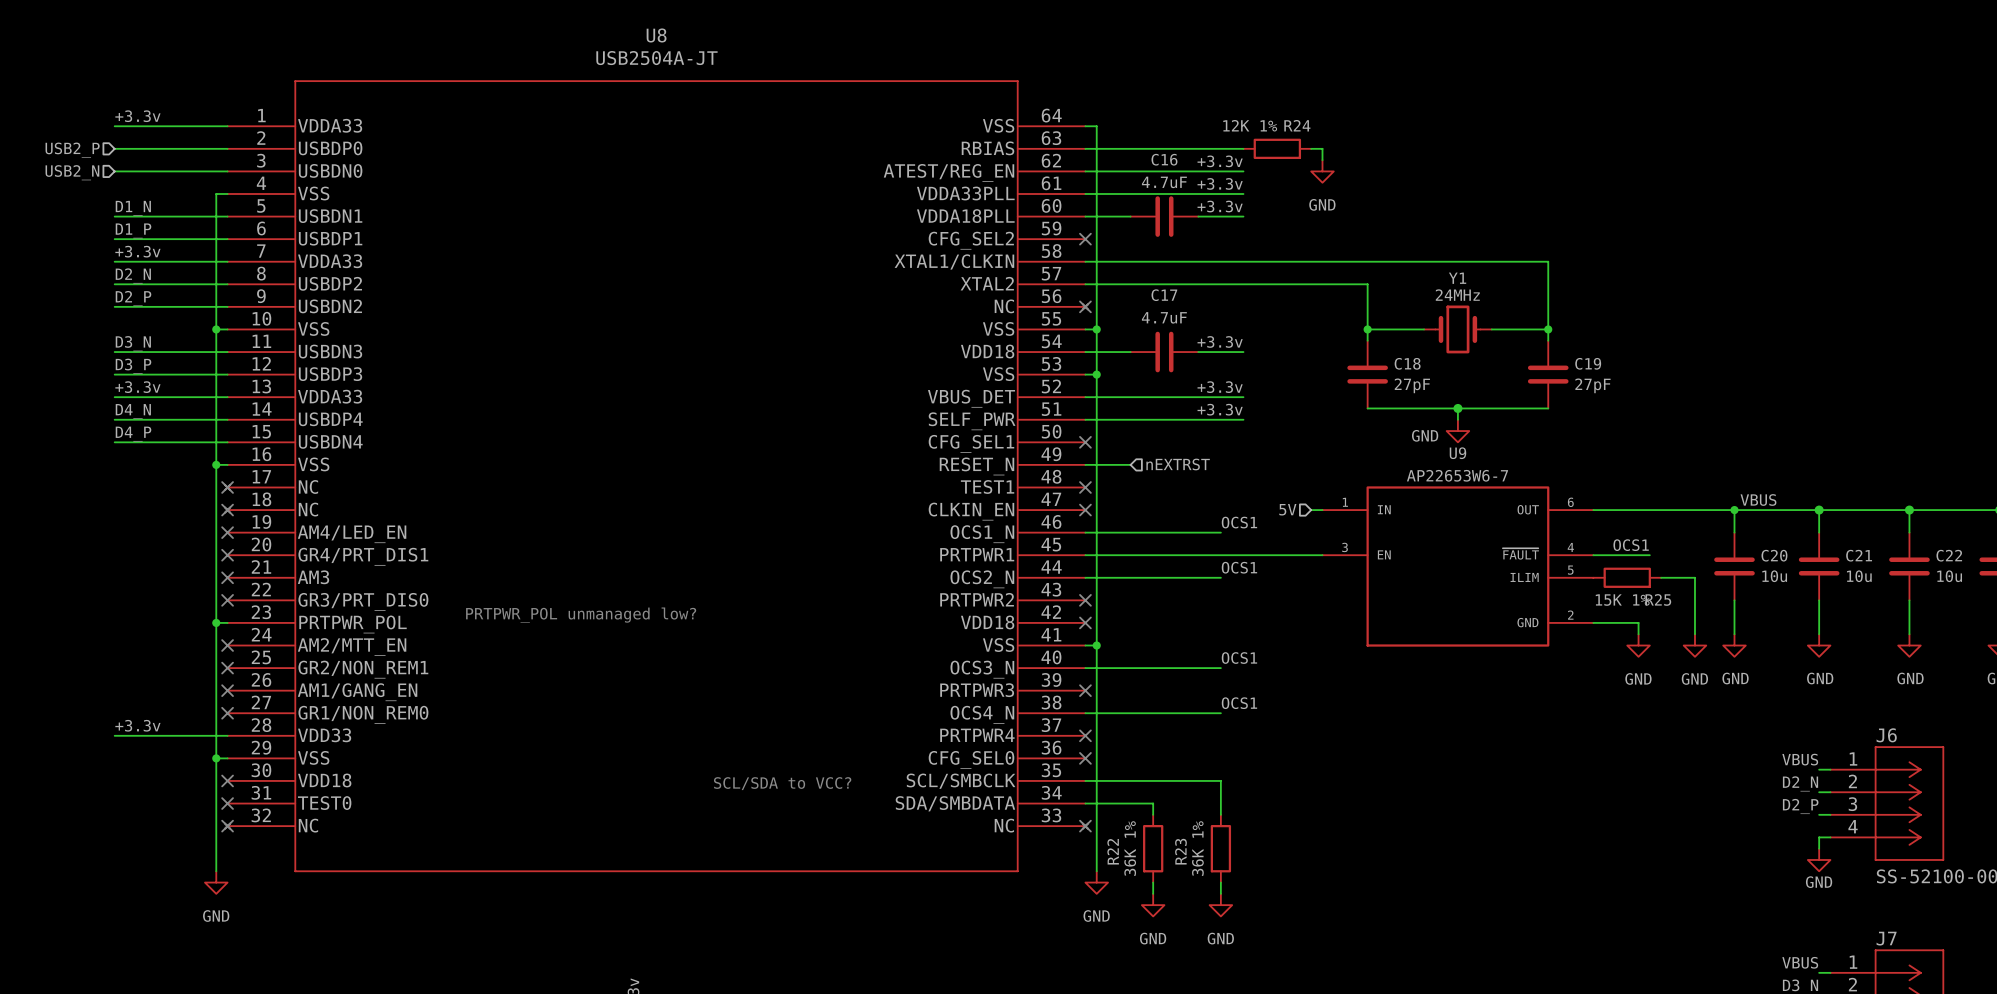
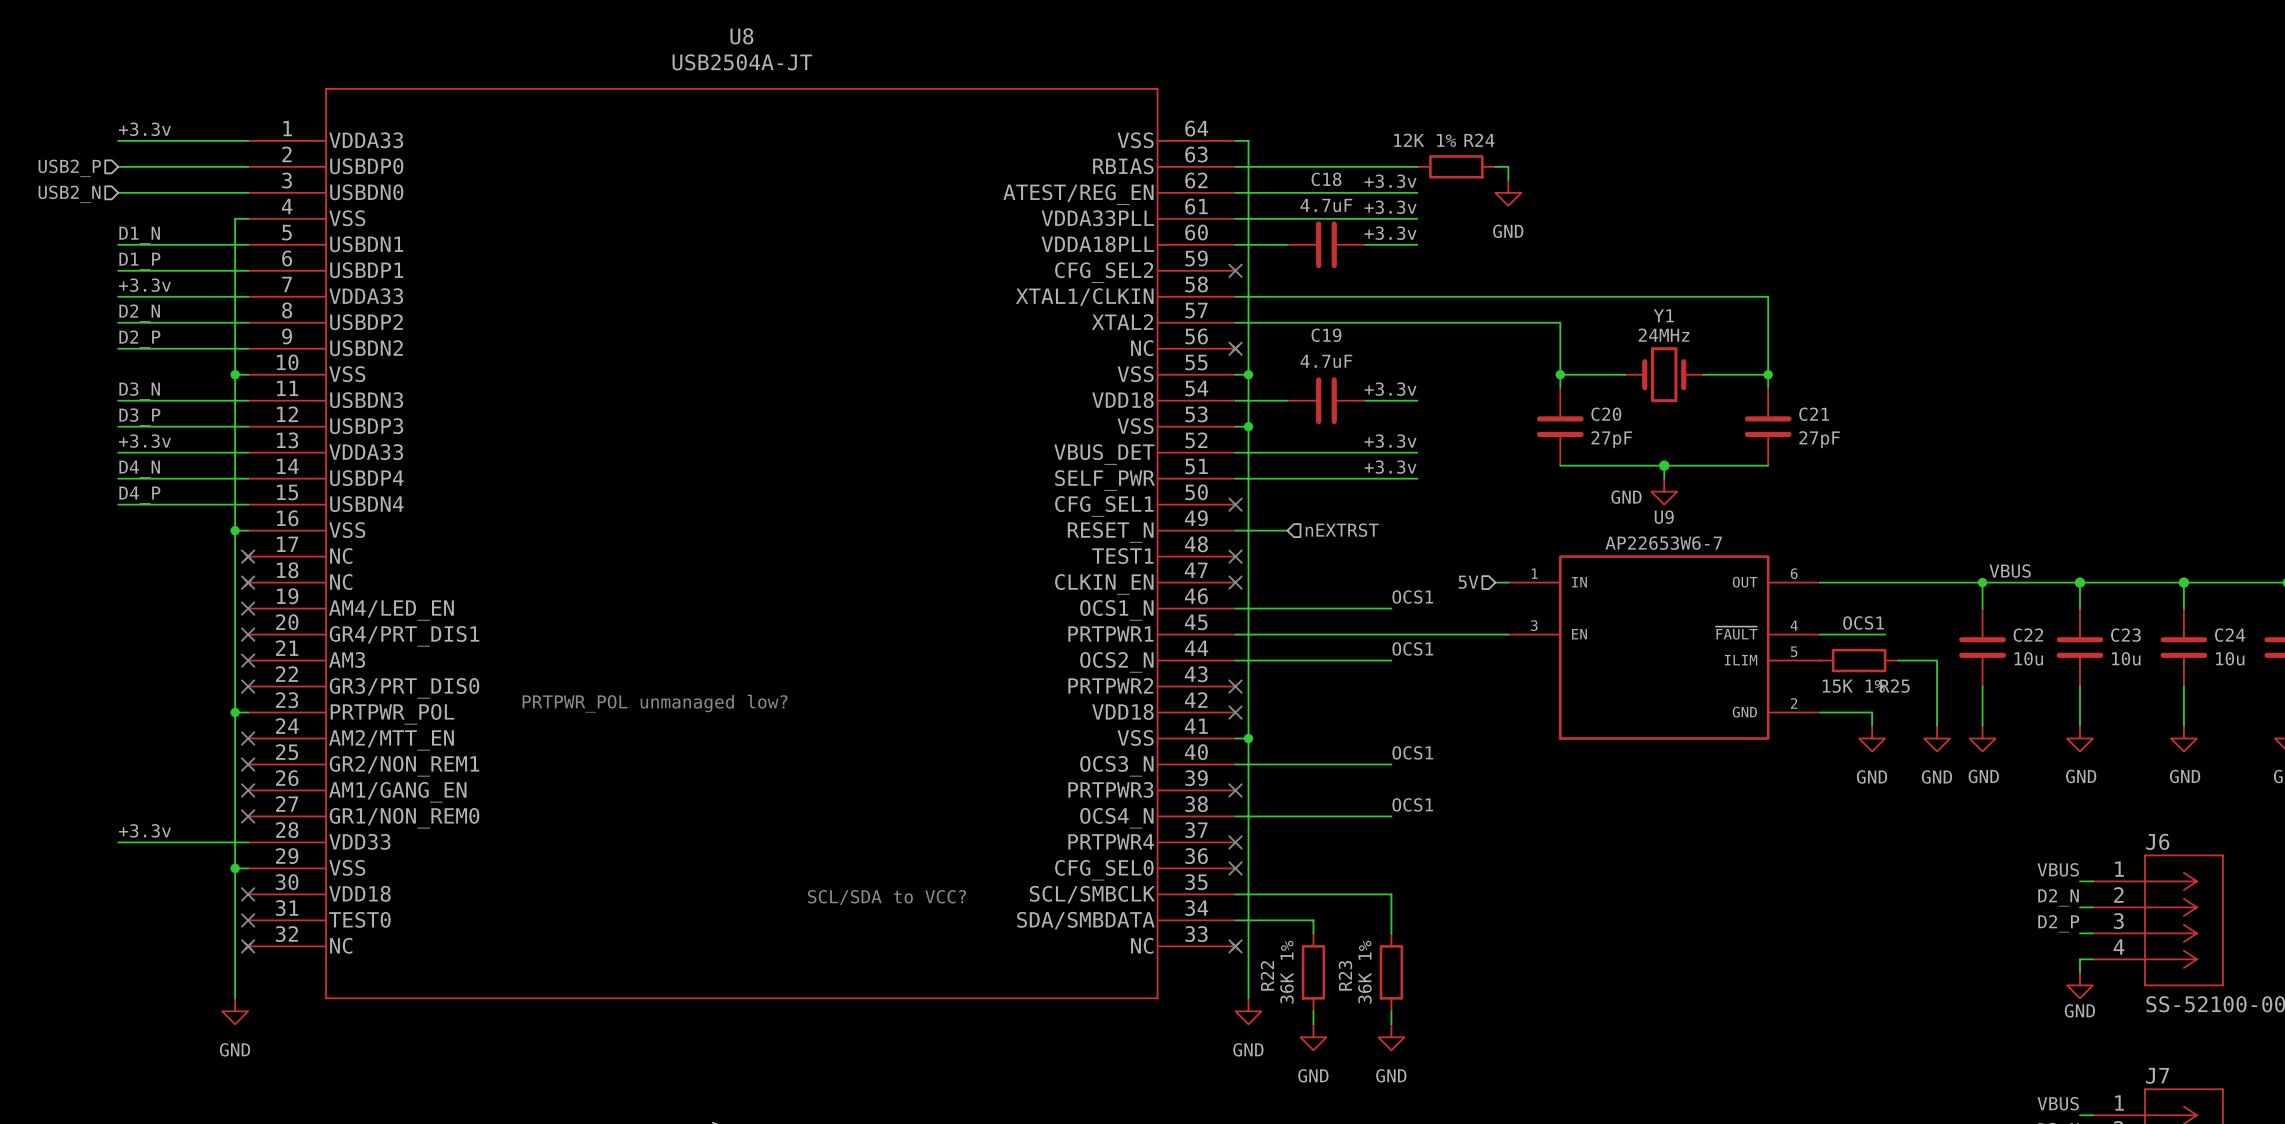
C16 name: C16 (1164, 159) -> C18 (1326, 179)
C17 name: C17 (1164, 295) -> C19 (1326, 335)
C18 name: C18 (1407, 363) -> C20 (1606, 414)
C19 name: C19 (1588, 363) -> C21 (1814, 414)
C20 name: C20 (1774, 555) -> C22 (2028, 635)
C21 name: C21 (1859, 555) -> C23 (2125, 635)
C22 name: C22 (1949, 555) -> C24 (2230, 635)

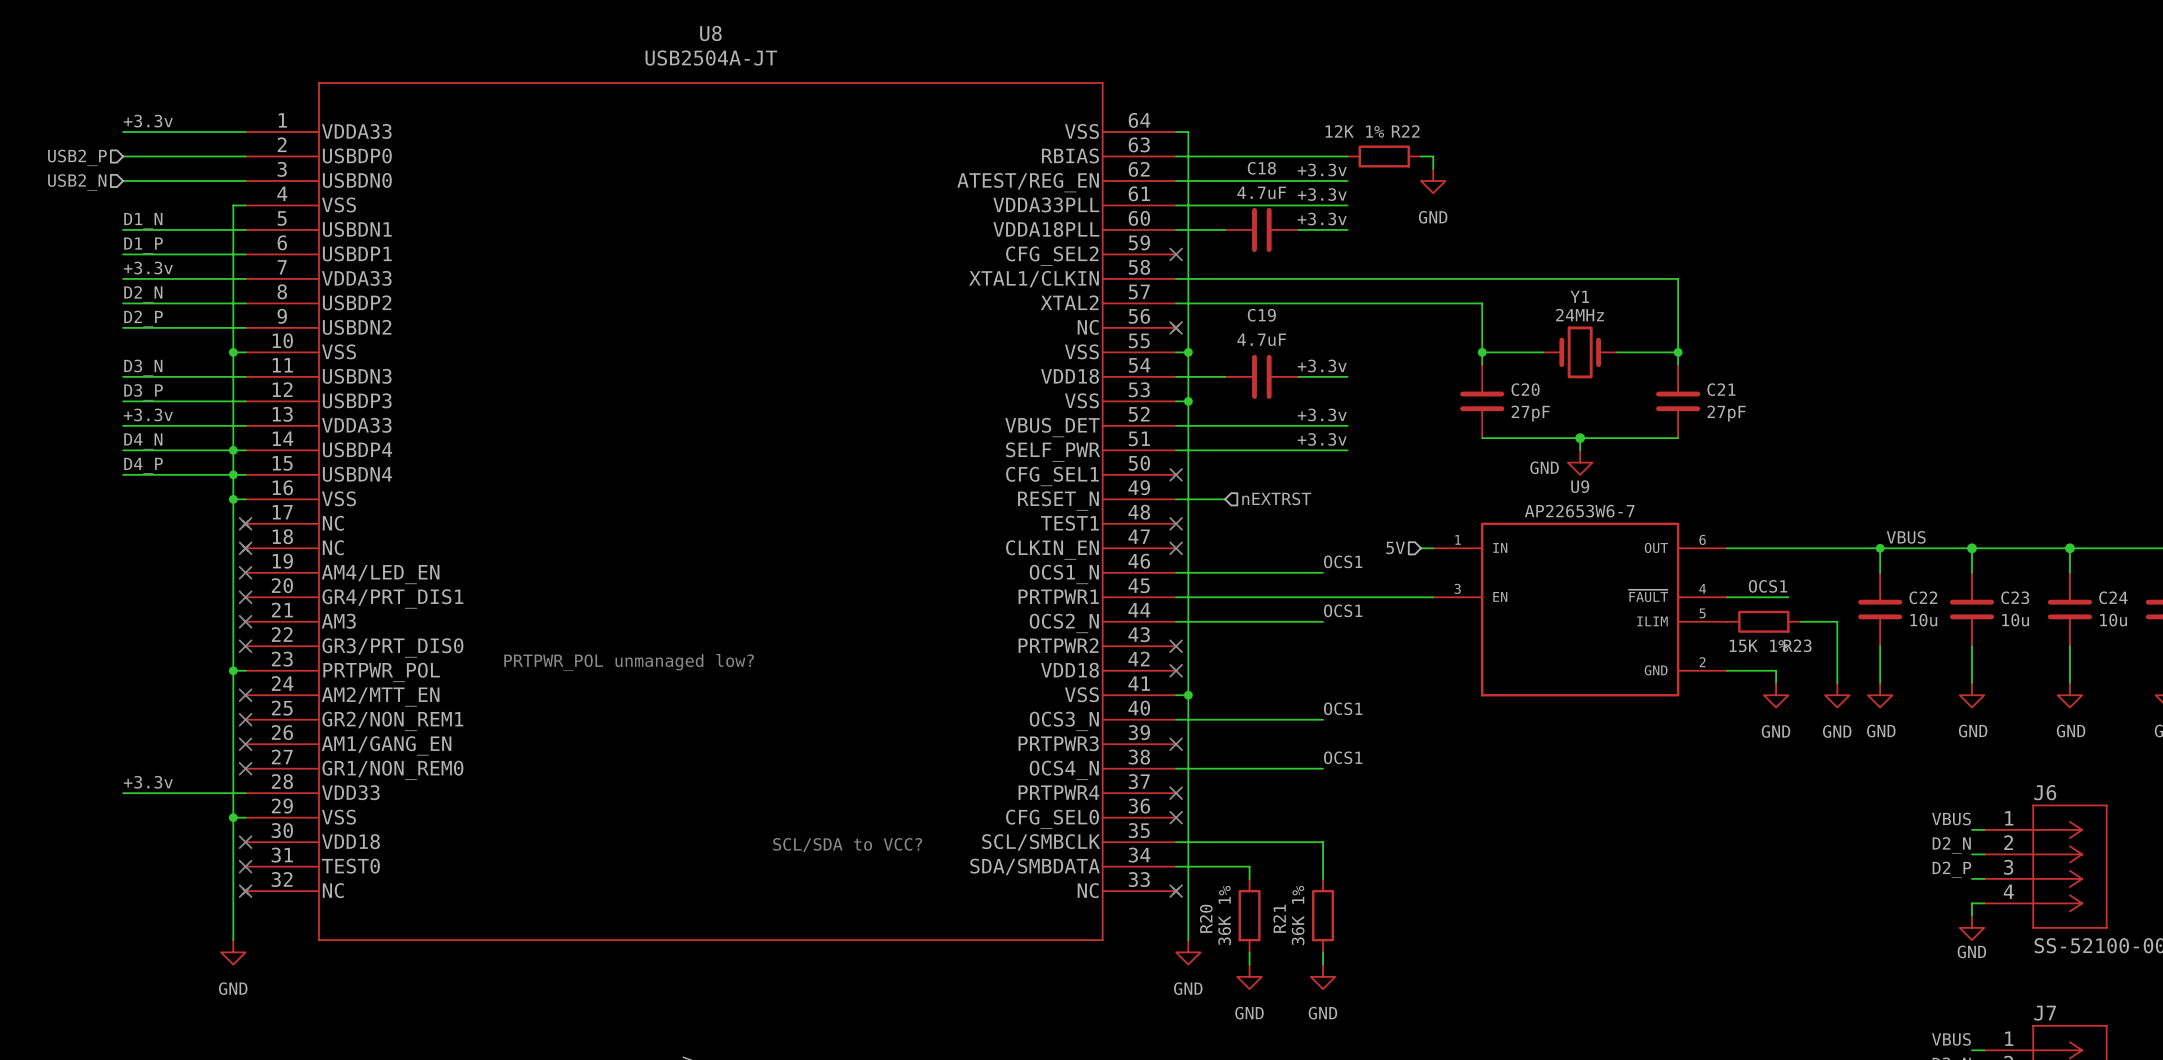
R24 name: R24 (1479, 140) -> R22 (1405, 131)
junction: none -> (233, 450)
junction: none -> (233, 474)
R25 name: R25 (1894, 686) -> R23 (1797, 645)
R22 name: R22 (1267, 975) -> R20 (1206, 918)
R23 name: R23 (1345, 975) -> R21 (1279, 918)

